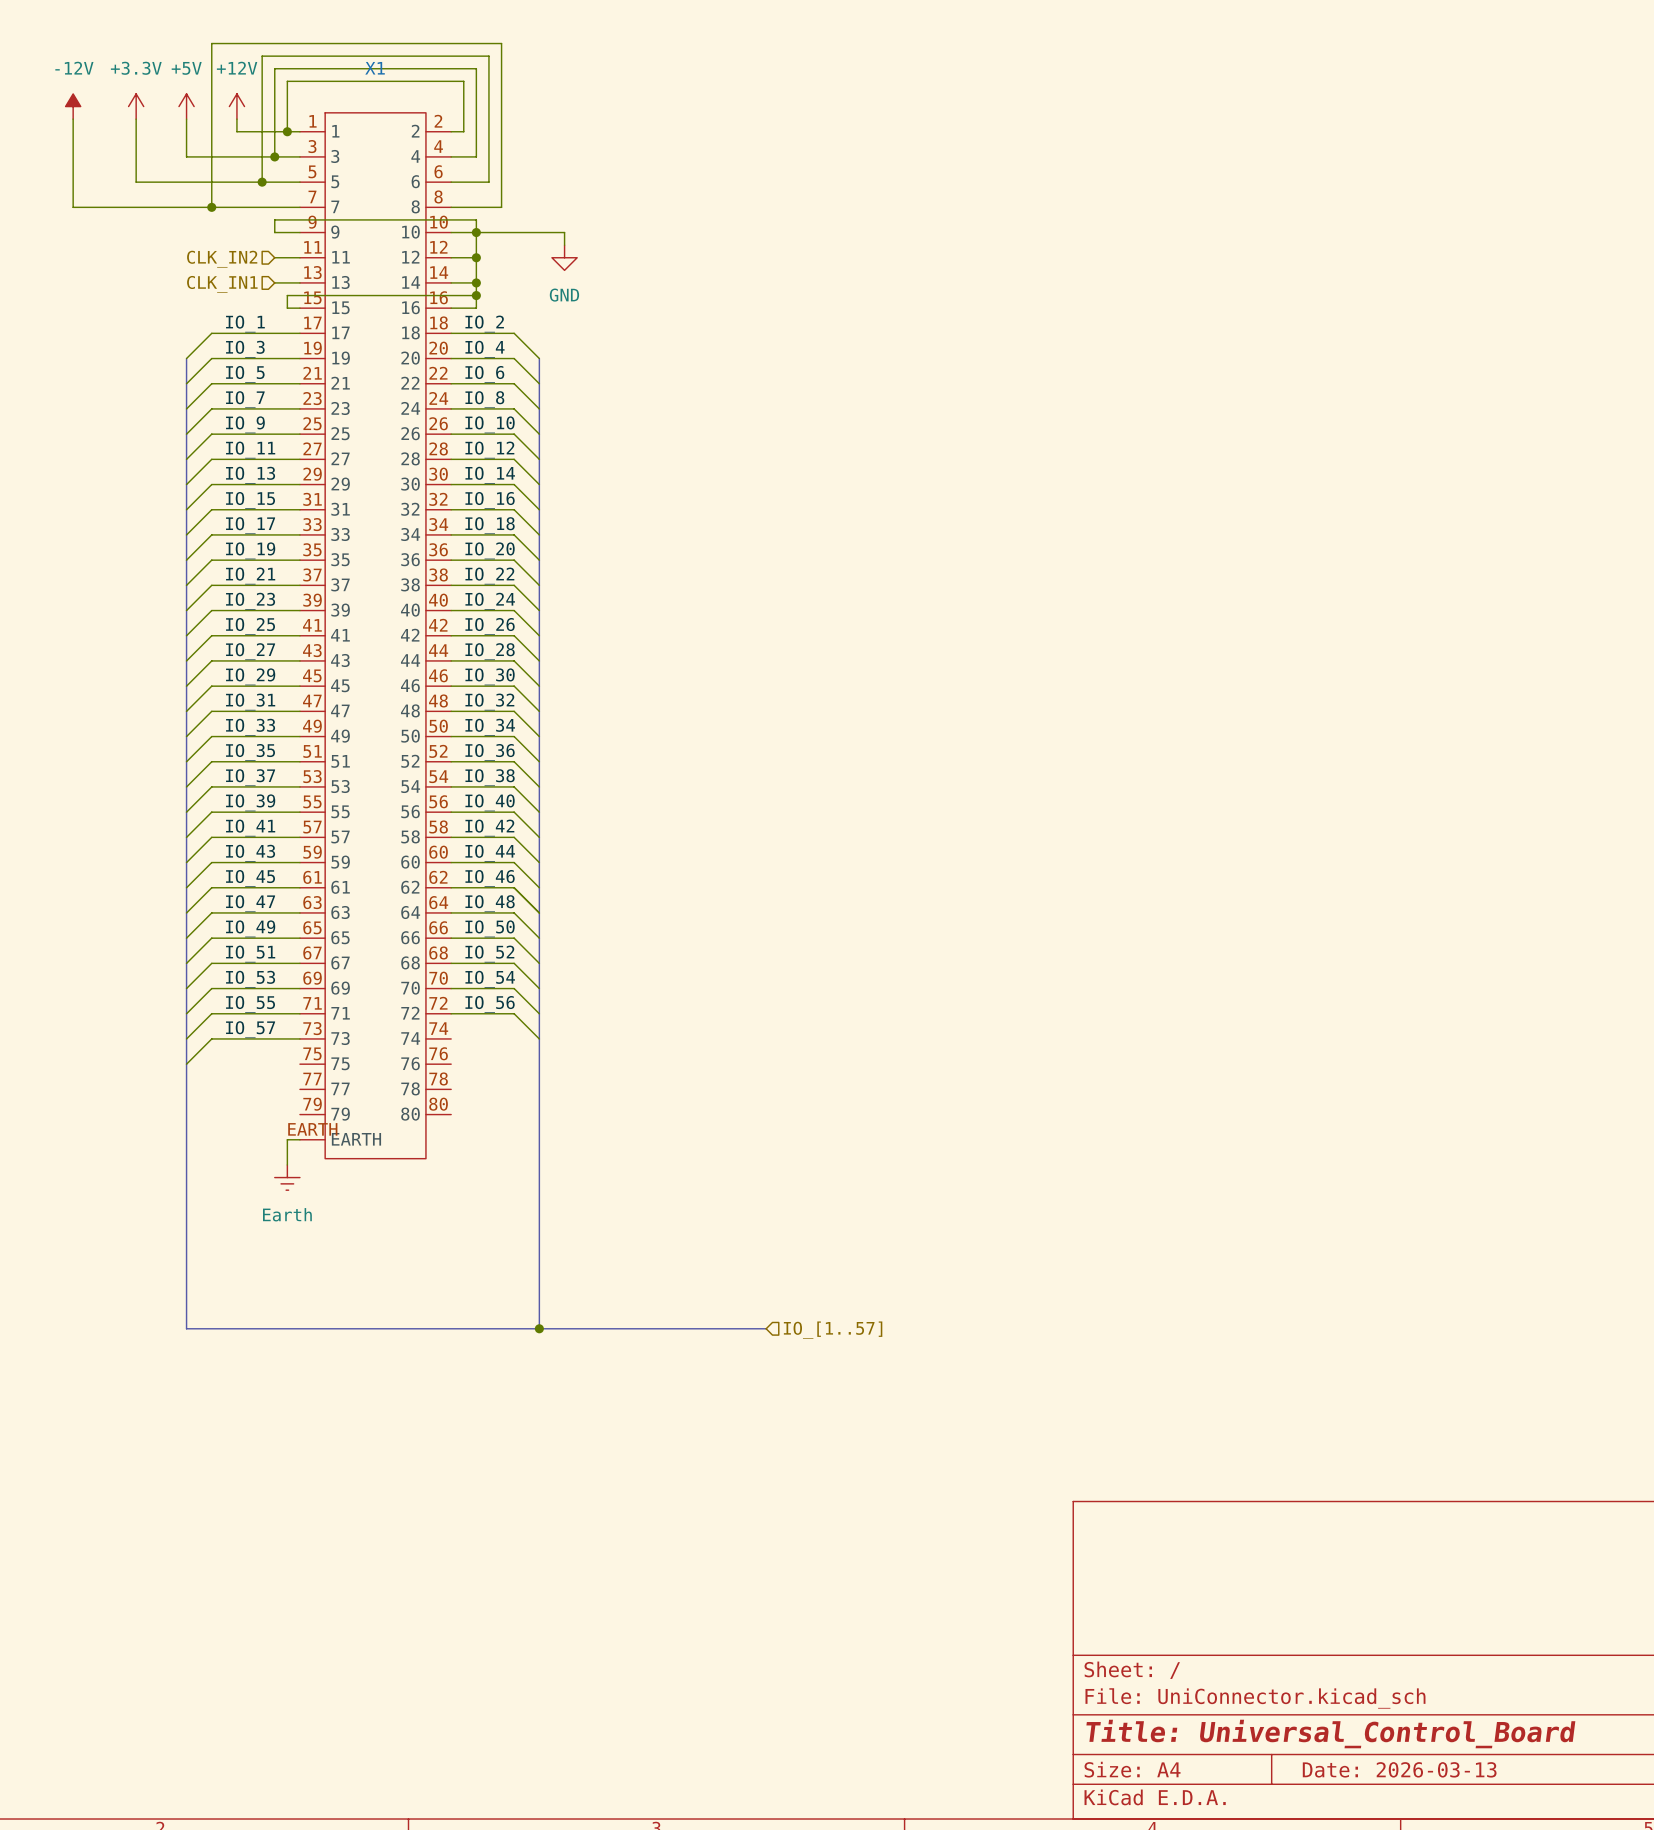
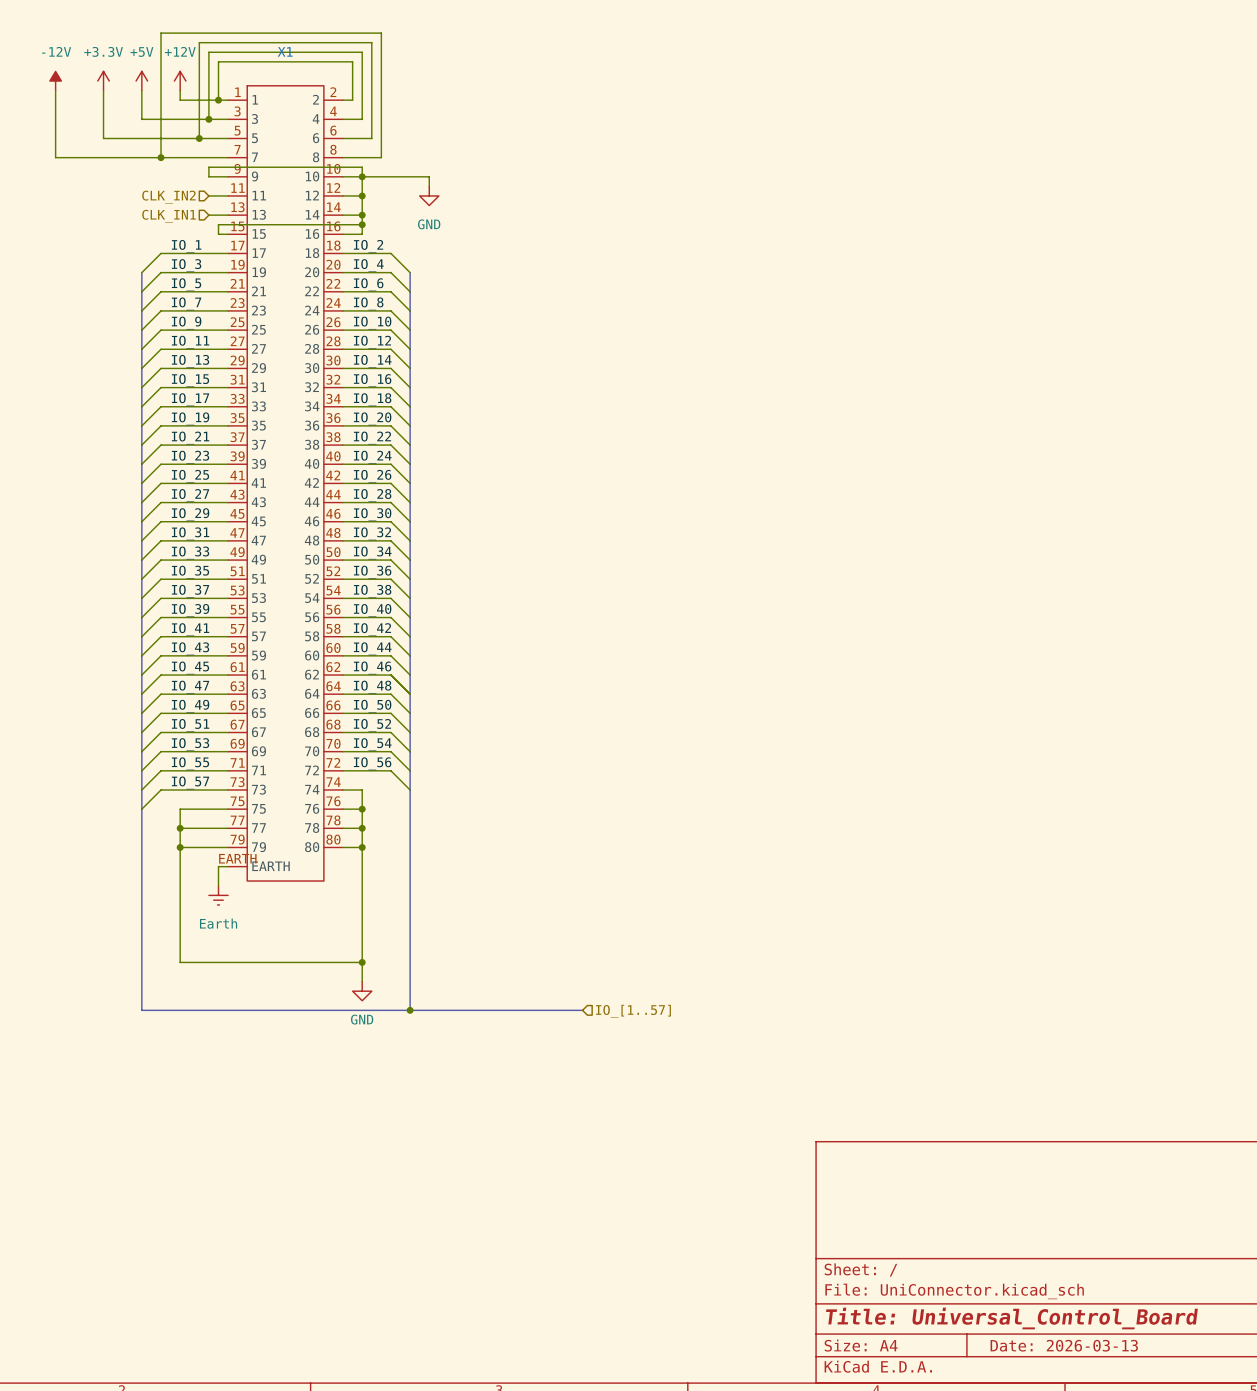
wire: none -> (343, 789) (362, 789) (362, 981)
wire: none -> (228, 809) (180, 809) (180, 962) (362, 962)
wire: none -> (343, 809) (362, 809)
junction: none -> (362, 809)
wire: none -> (180, 828) (228, 828)
junction: none -> (180, 828)
wire: none -> (343, 828) (362, 828)
junction: none -> (362, 828)
wire: none -> (180, 847) (228, 847)
junction: none -> (180, 847)
wire: none -> (343, 847) (362, 847)
junction: none -> (362, 847)
junction: none -> (362, 962)
power symbol: none -> GND (362, 991)

